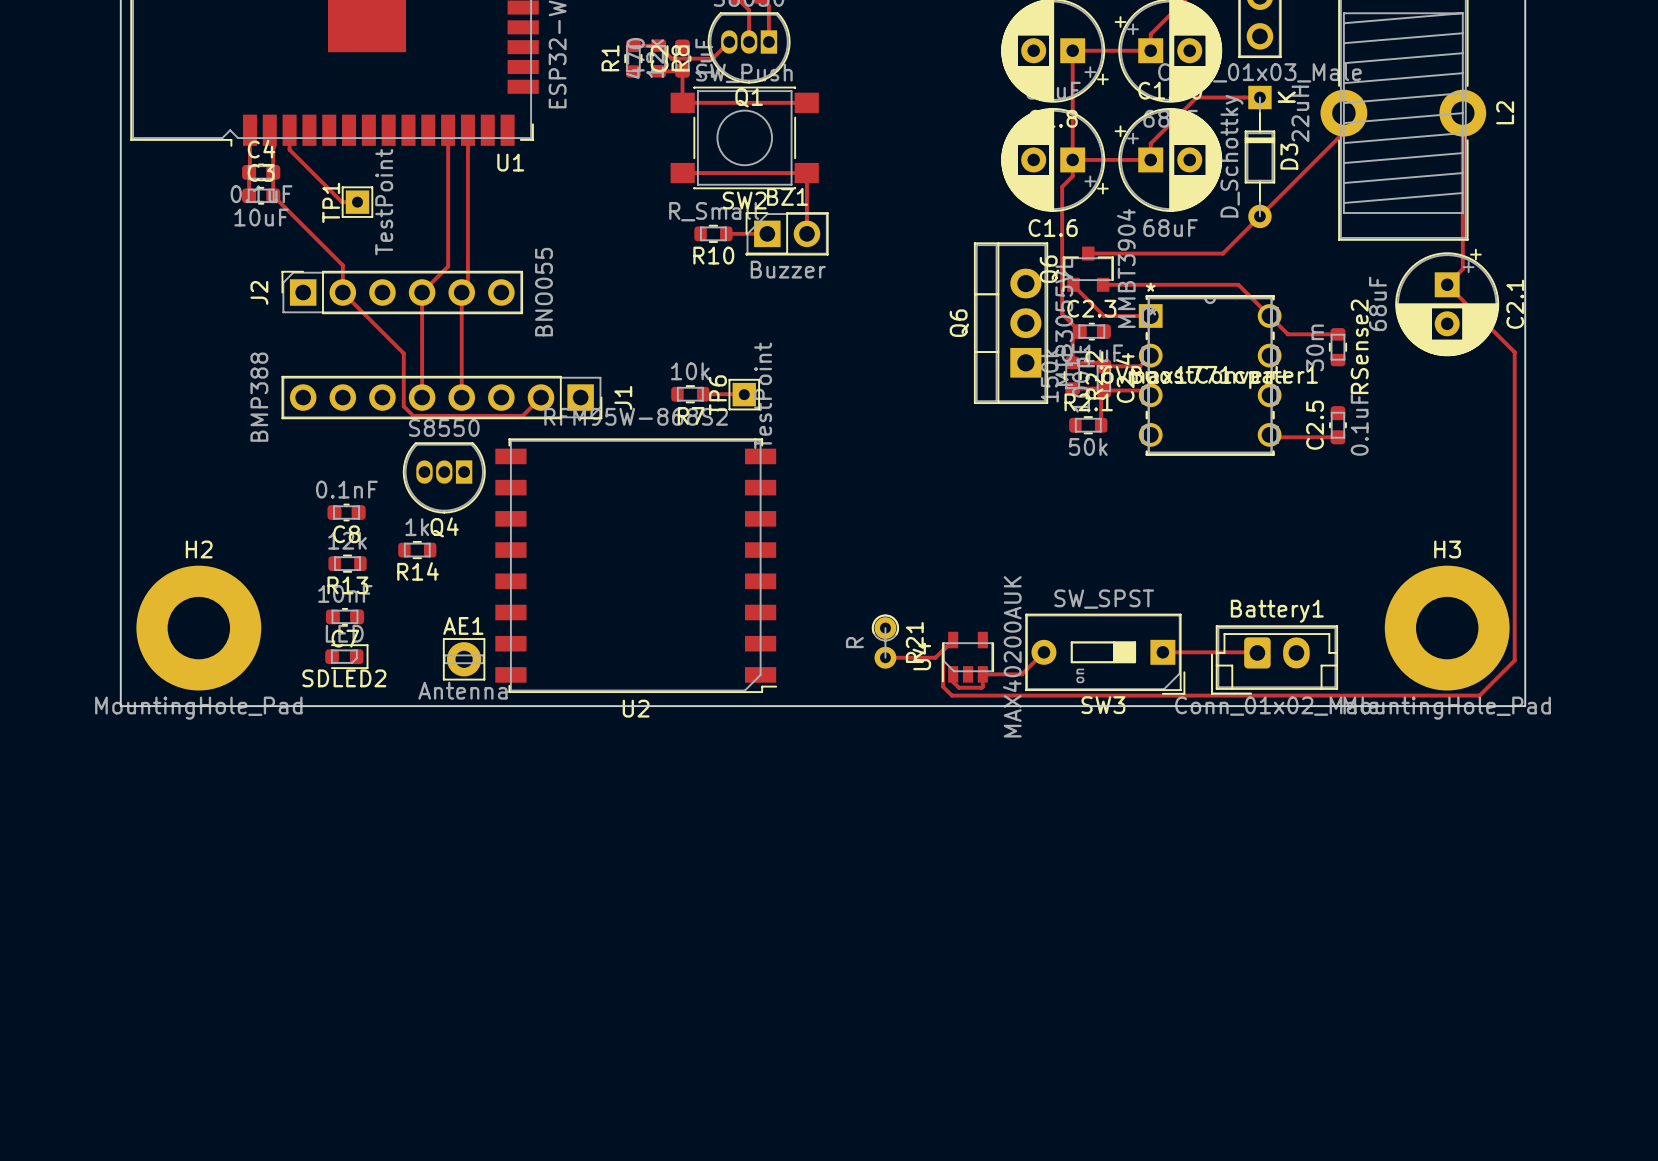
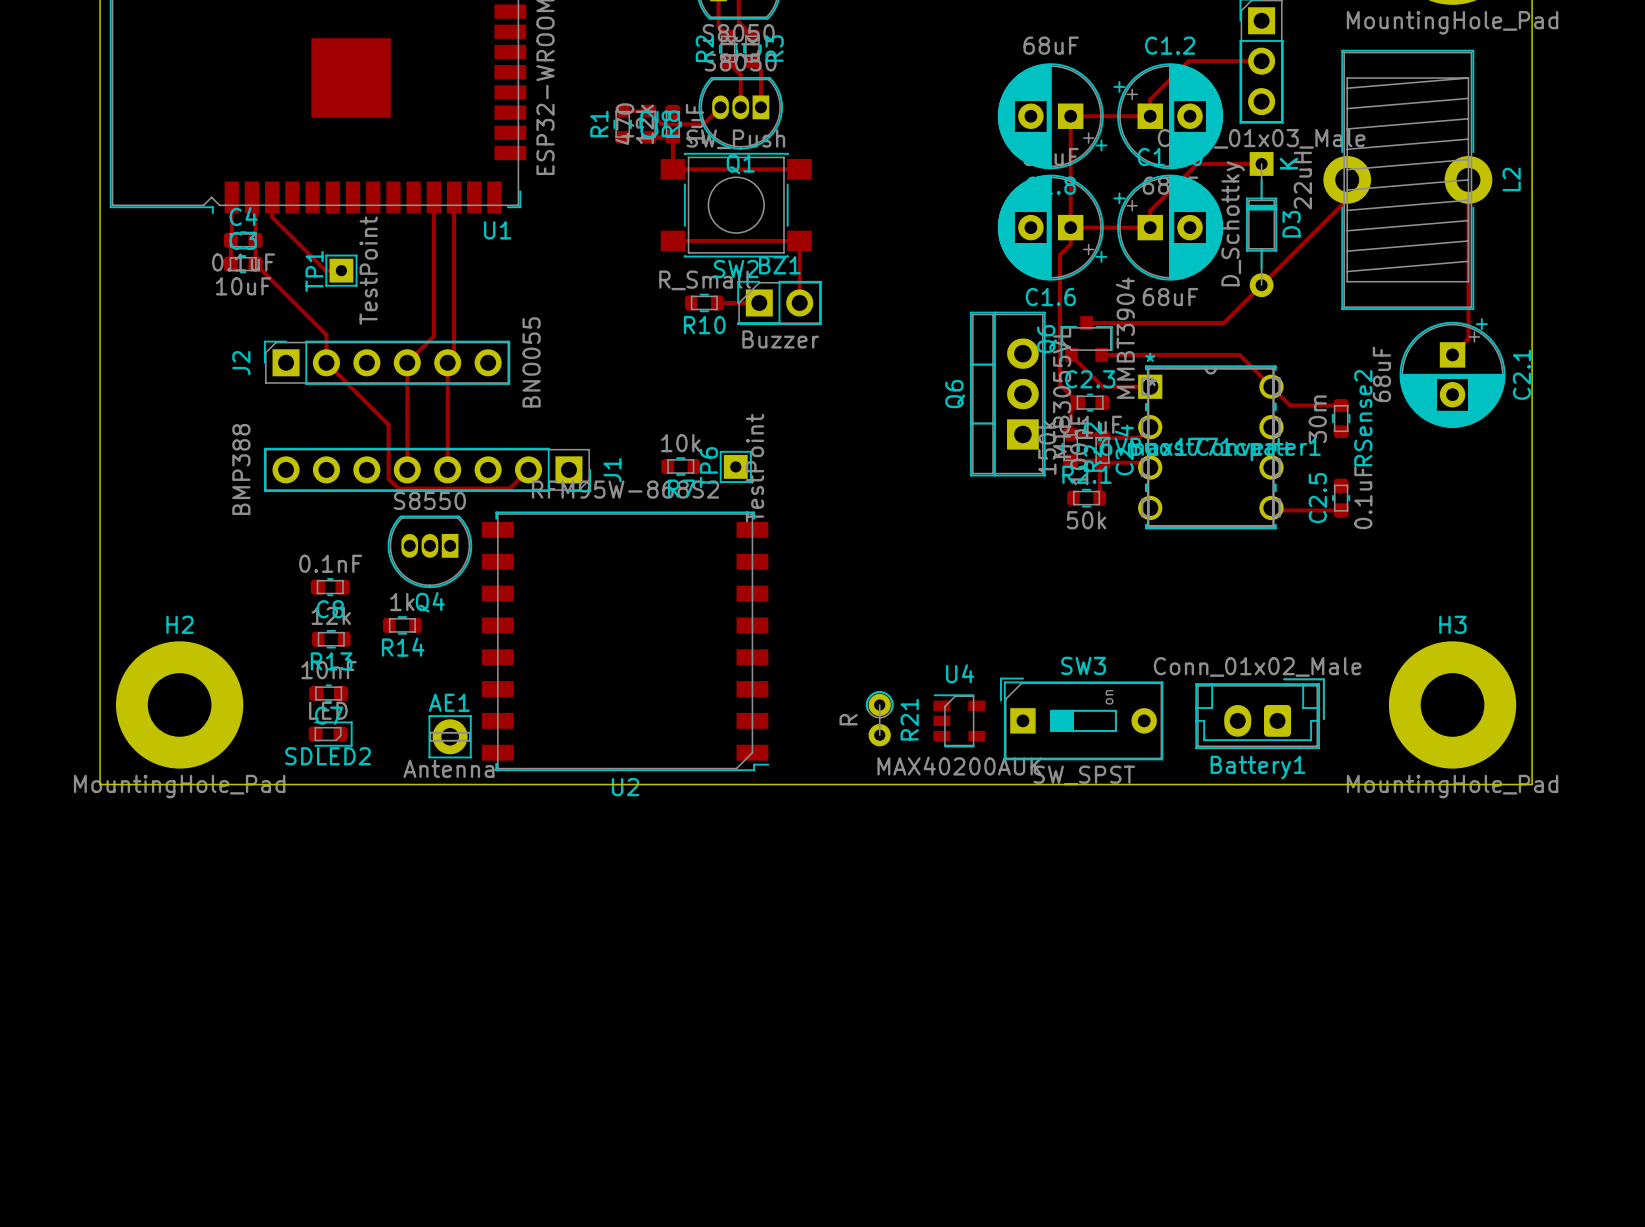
top track: (1447, 284) (1514, 352) (1514, 660) (1479, 695) (951, 695) (943, 686) (943, 650) -> none
top track: (703, 394) (744, 394) -> none
top track: (953, 640) (935, 657) (885, 657) -> none
top track: (1043, 652) (1021, 674) (982, 674) (981, 687) (958, 687) (953, 682) (953, 674) -> none
top track: (1162, 652) (1257, 652) -> none
SW3 rotation: 0° (1105, 654) -> 180° (1081, 718)
U4 rotation: 0° (968, 657) -> 90° clockwise (959, 720)
Battery1 rotation: 0° (1274, 659) -> 180° (1260, 713)

